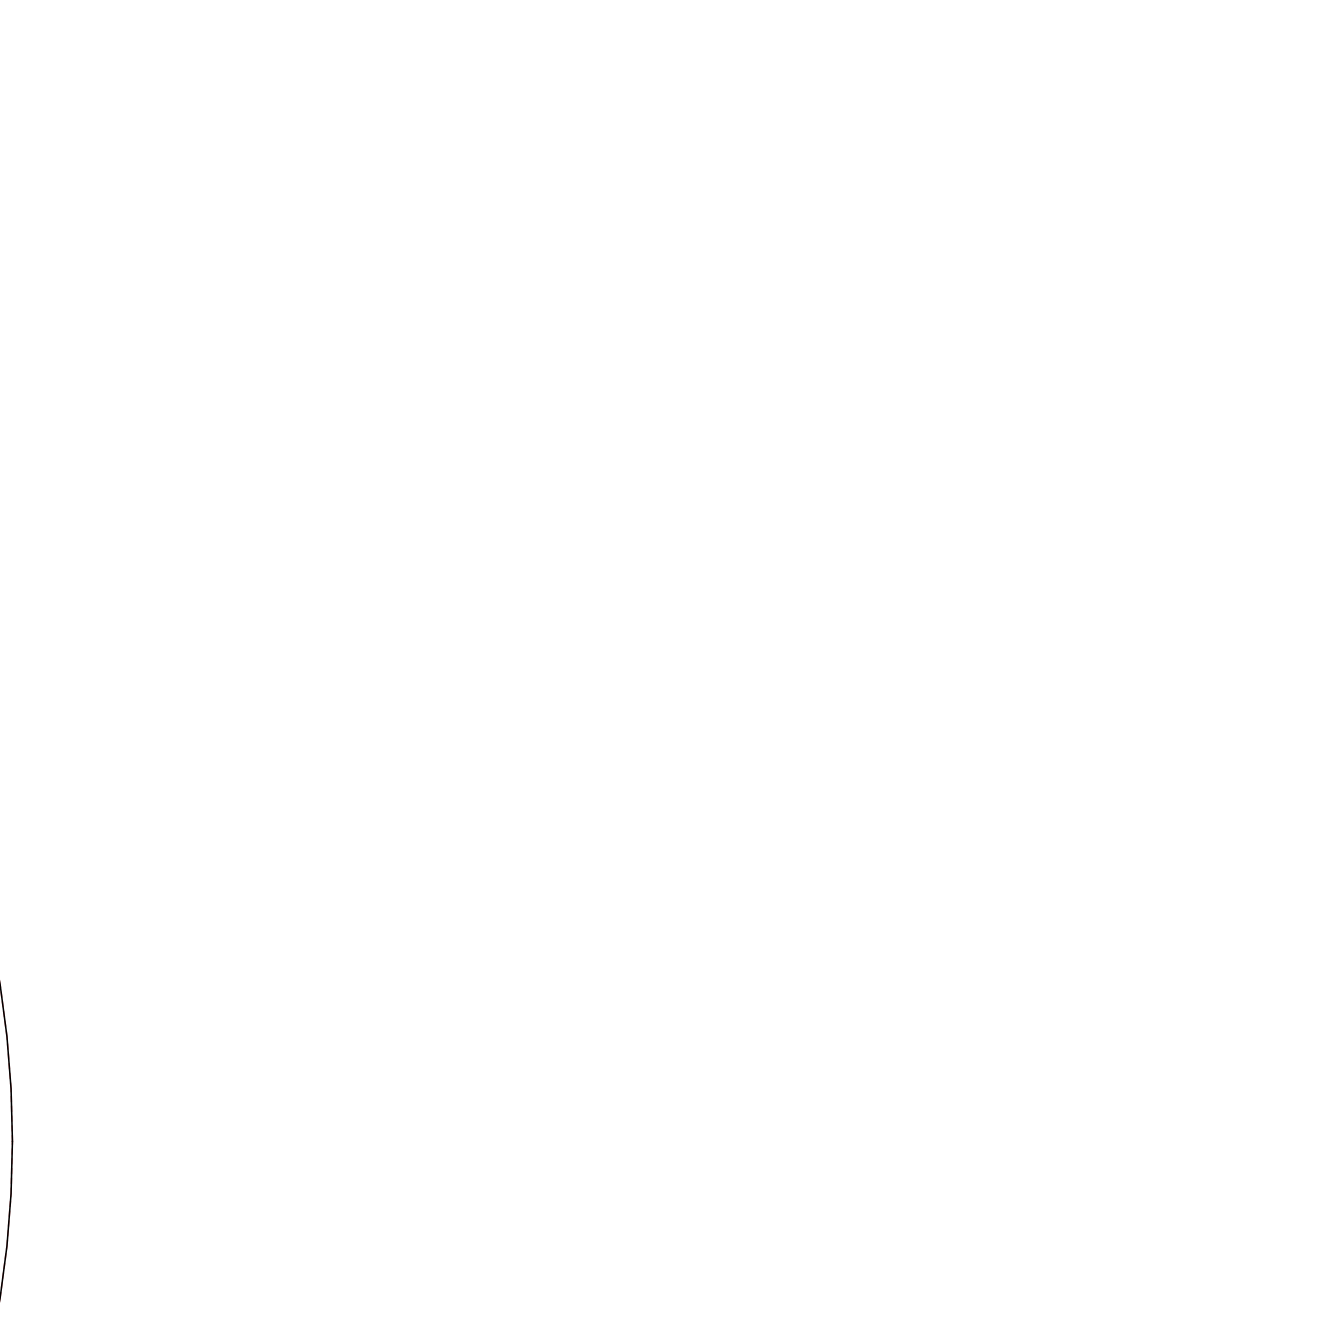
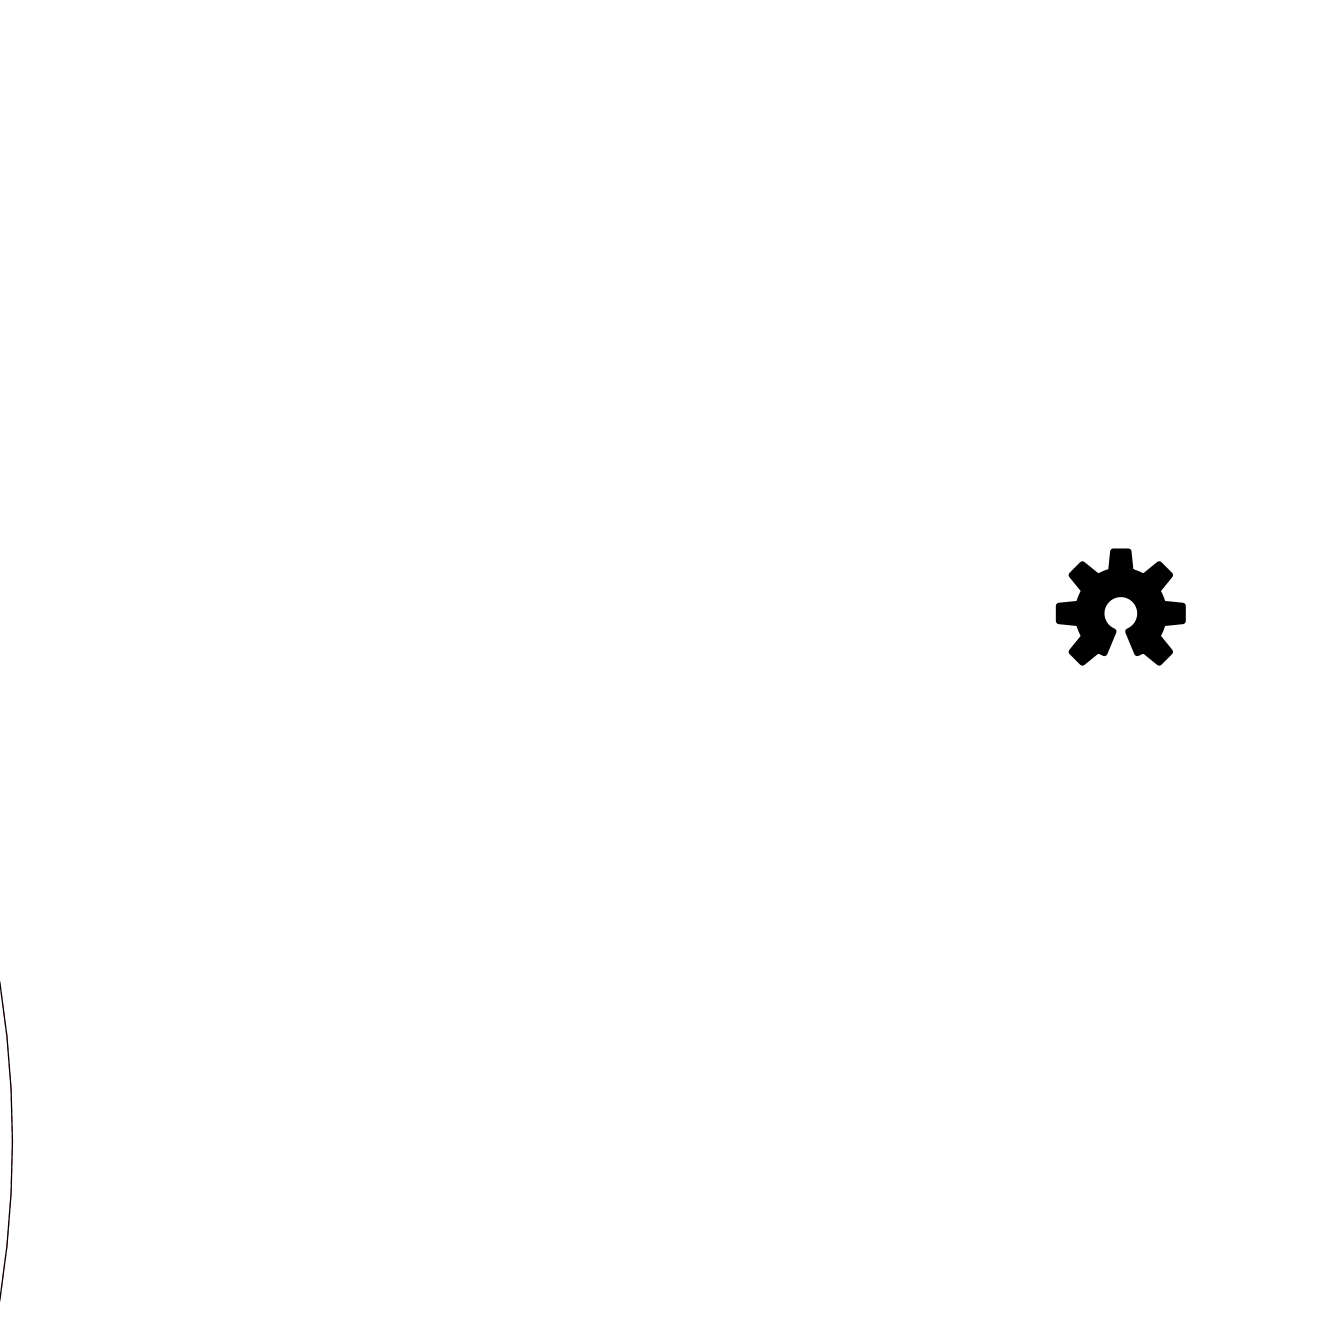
drawing: none -> [1055, 548, 1186, 666]

